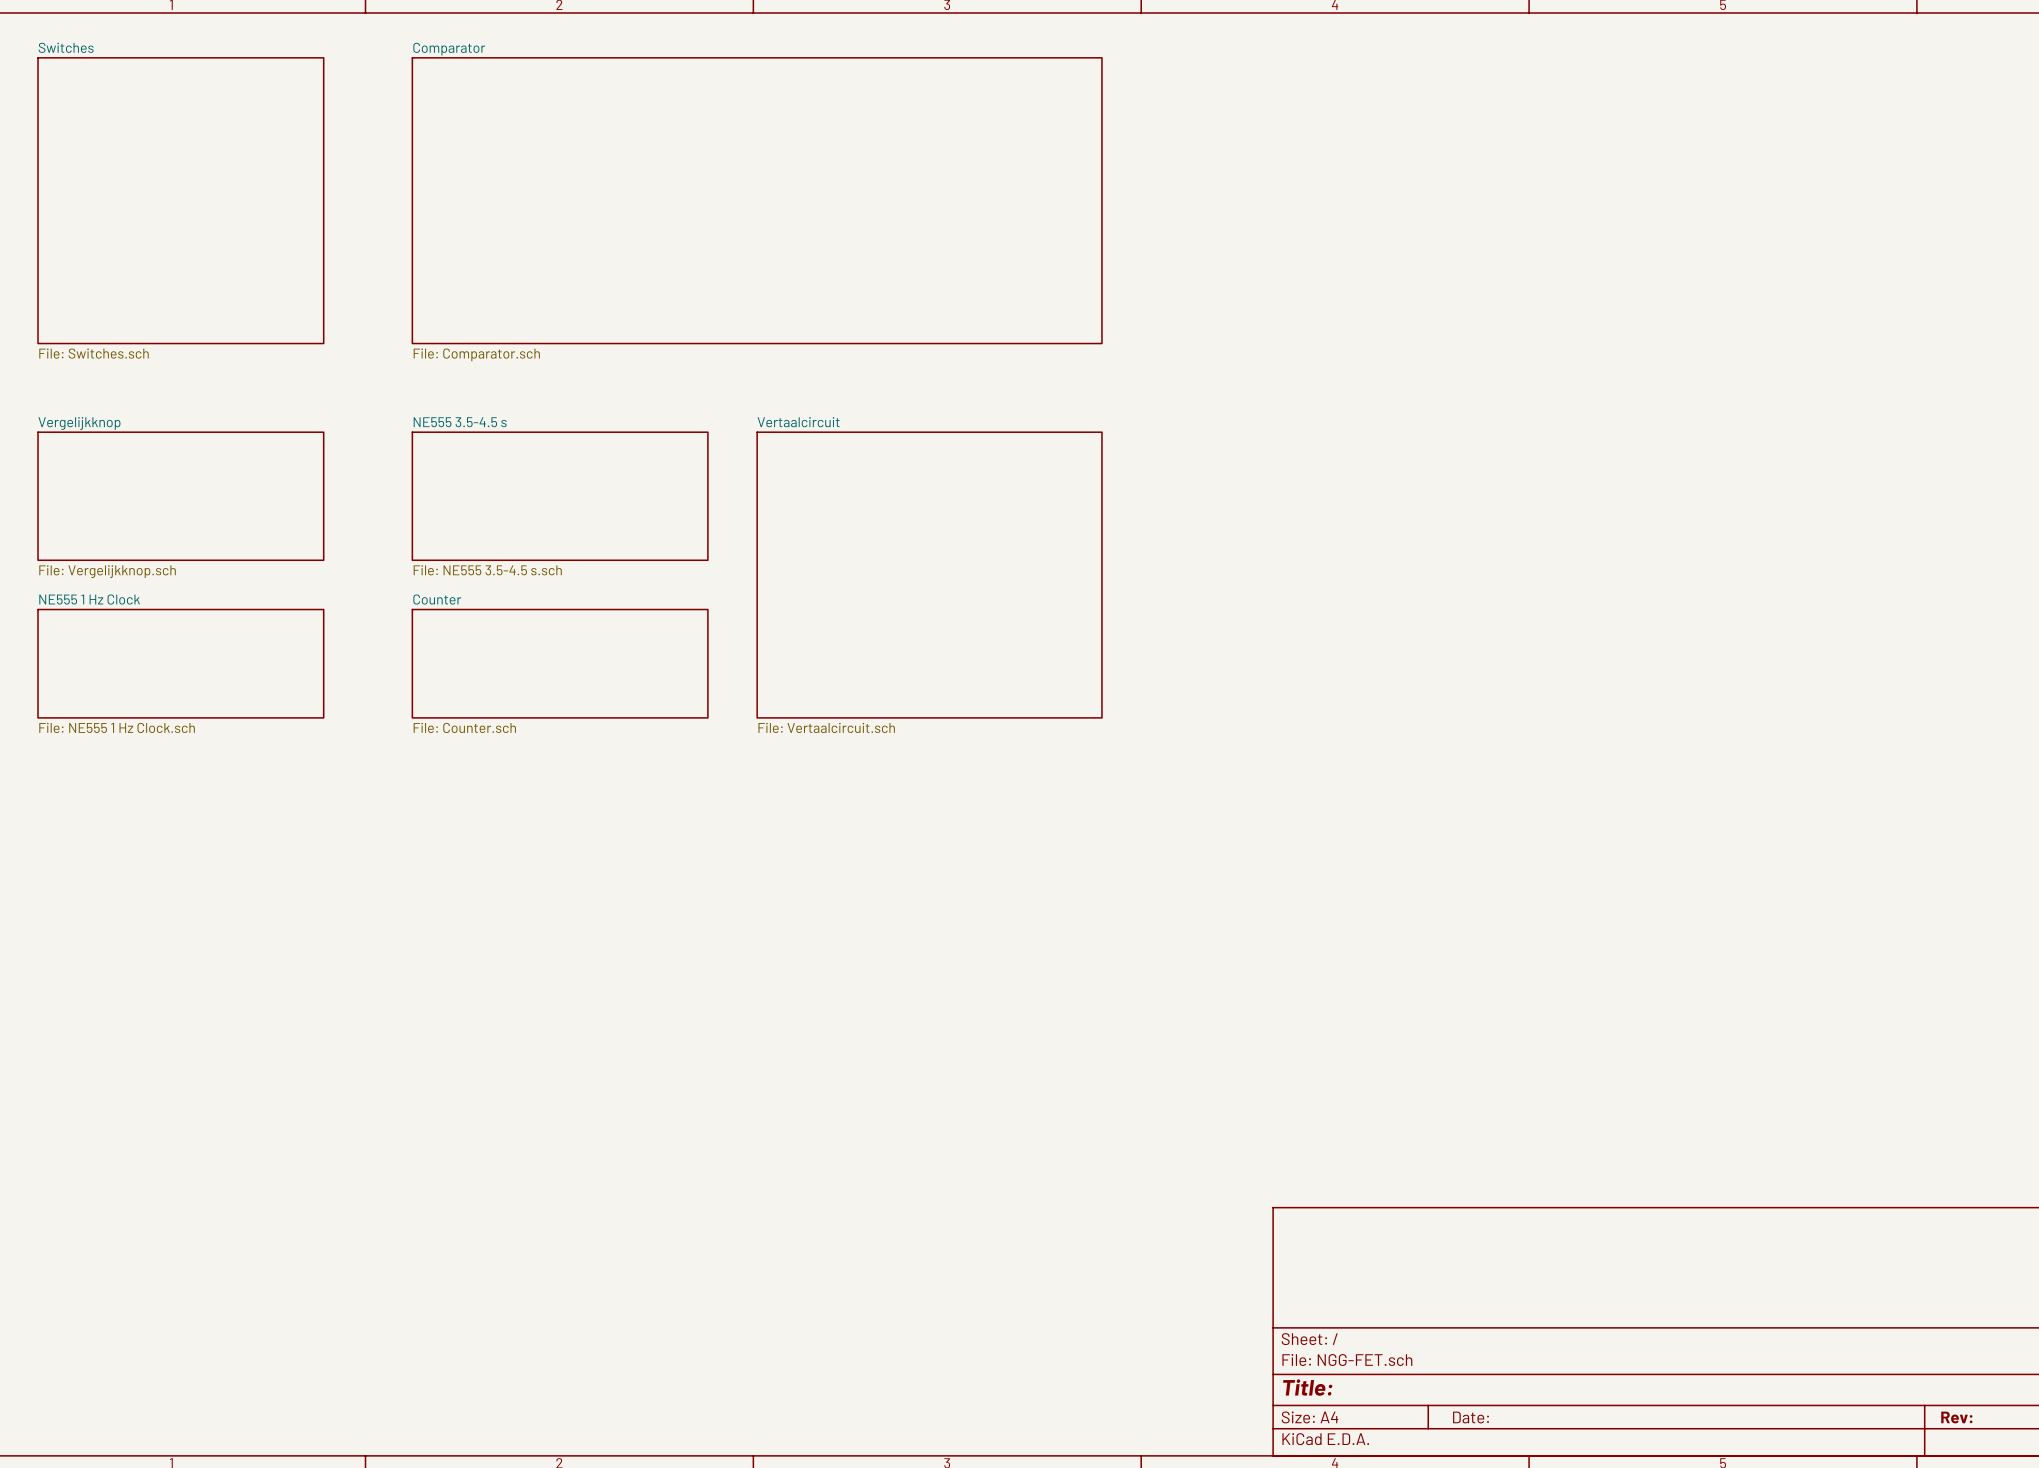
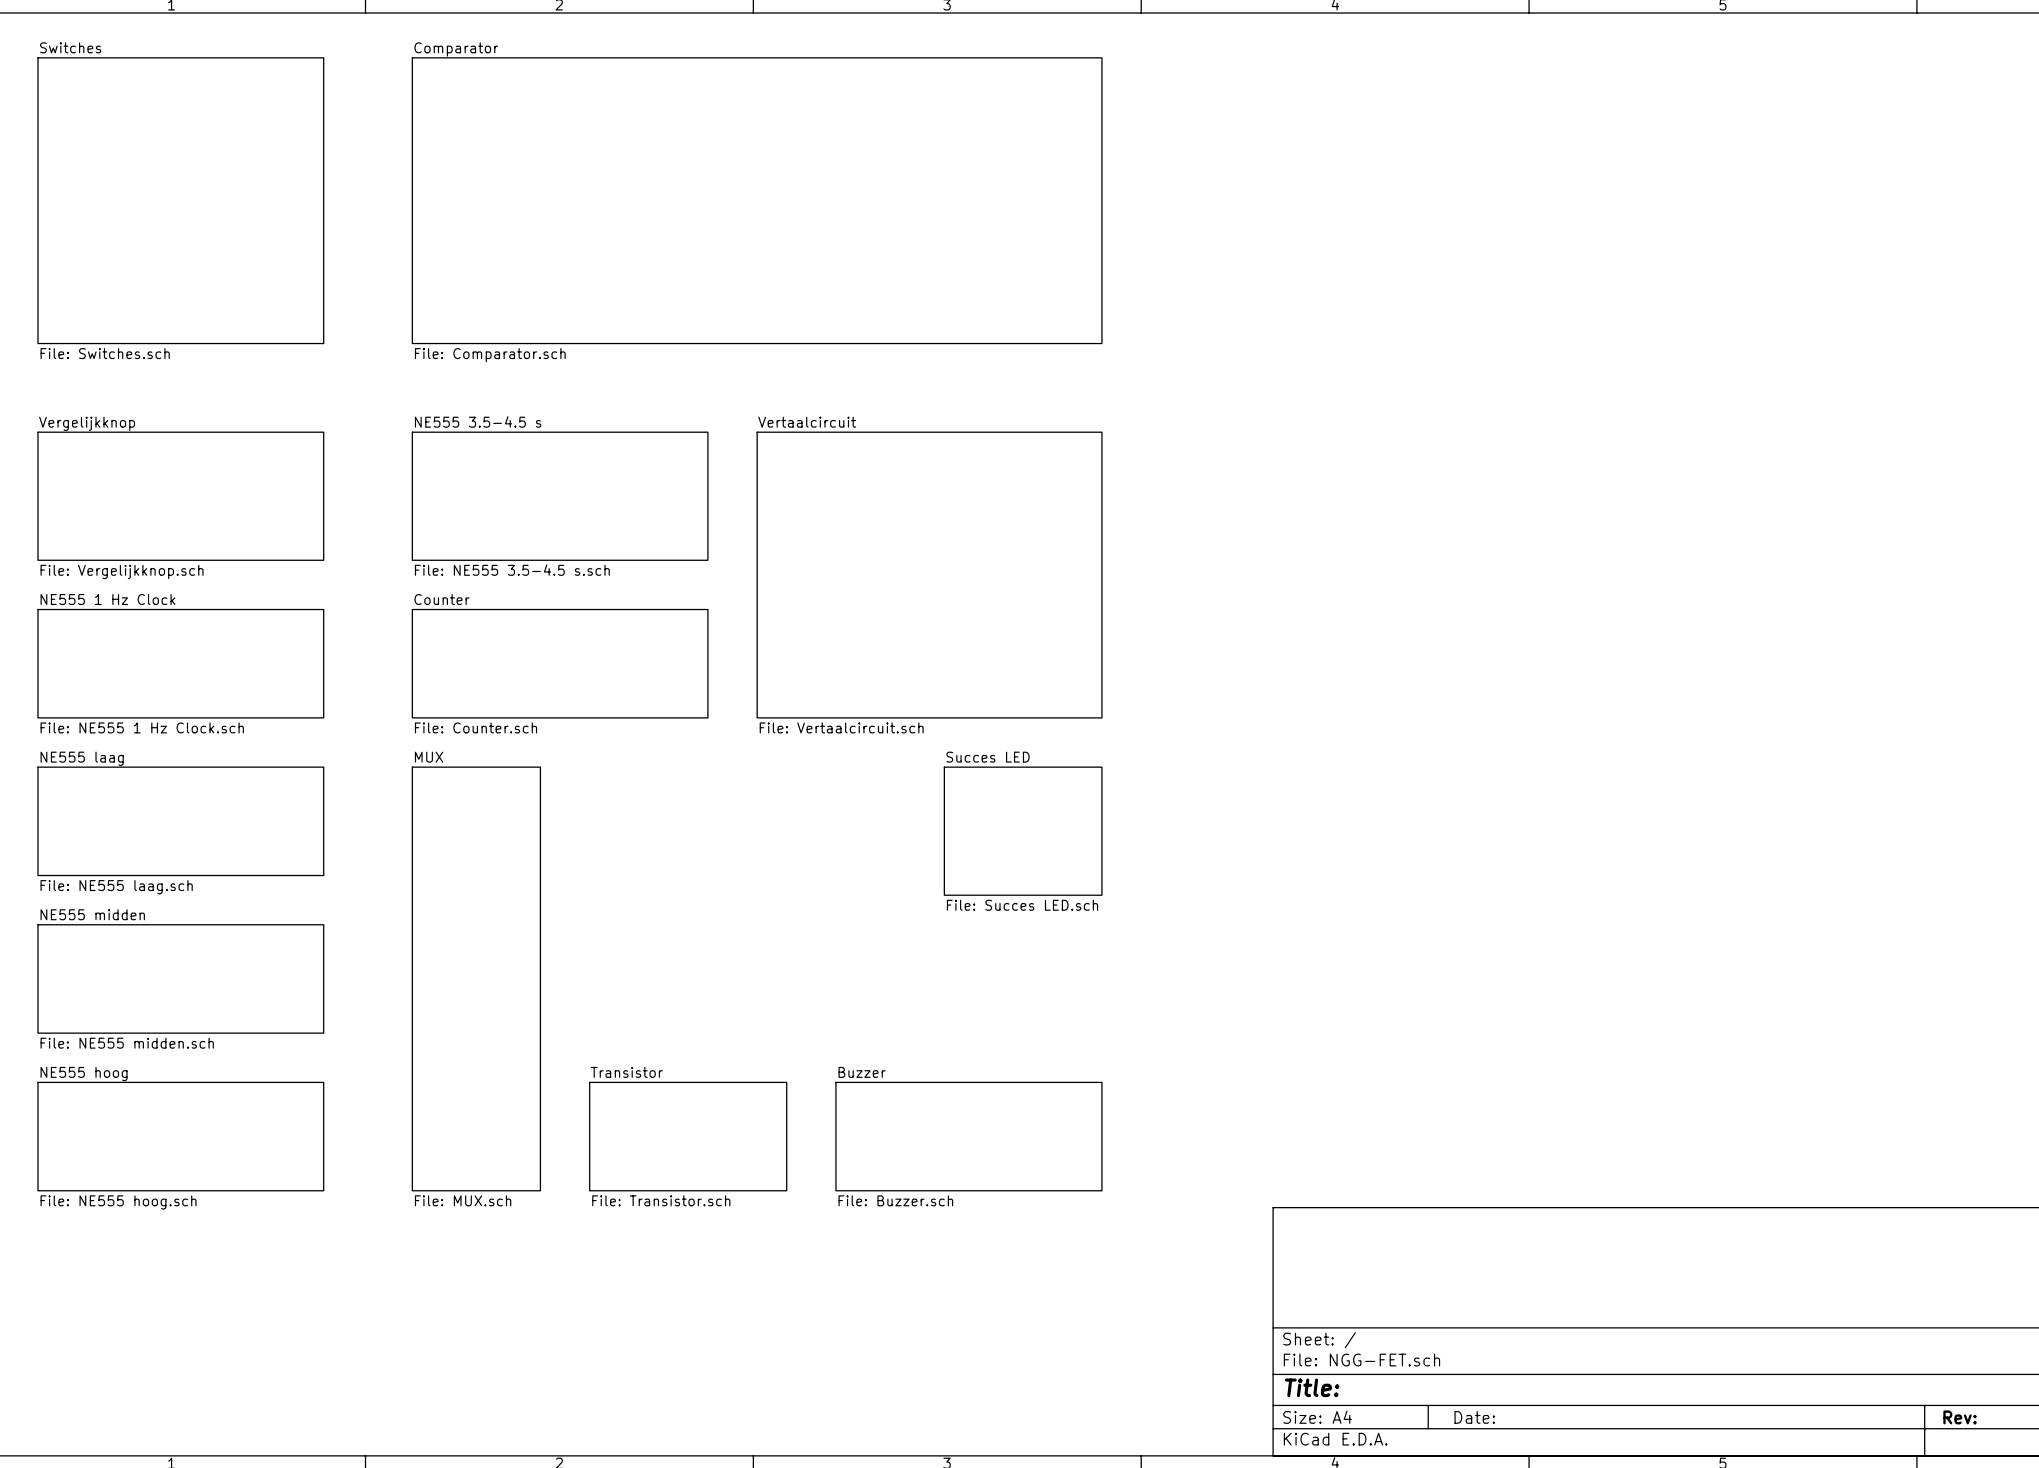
sheet NE555 laag: none -> File: NE555 laag.sch (180, 821)
sheet Succes LED: none -> File: Succes LED.sch (1023, 831)
sheet NE555 midden: none -> File: NE555 midden.sch (180, 978)
sheet MUX: none -> File: MUX.sch (476, 978)
sheet NE555 hoog: none -> File: NE555 hoog.sch (180, 1136)
sheet Transistor: none -> File: Transistor.sch (688, 1136)
sheet Buzzer: none -> File: Buzzer.sch (968, 1136)

